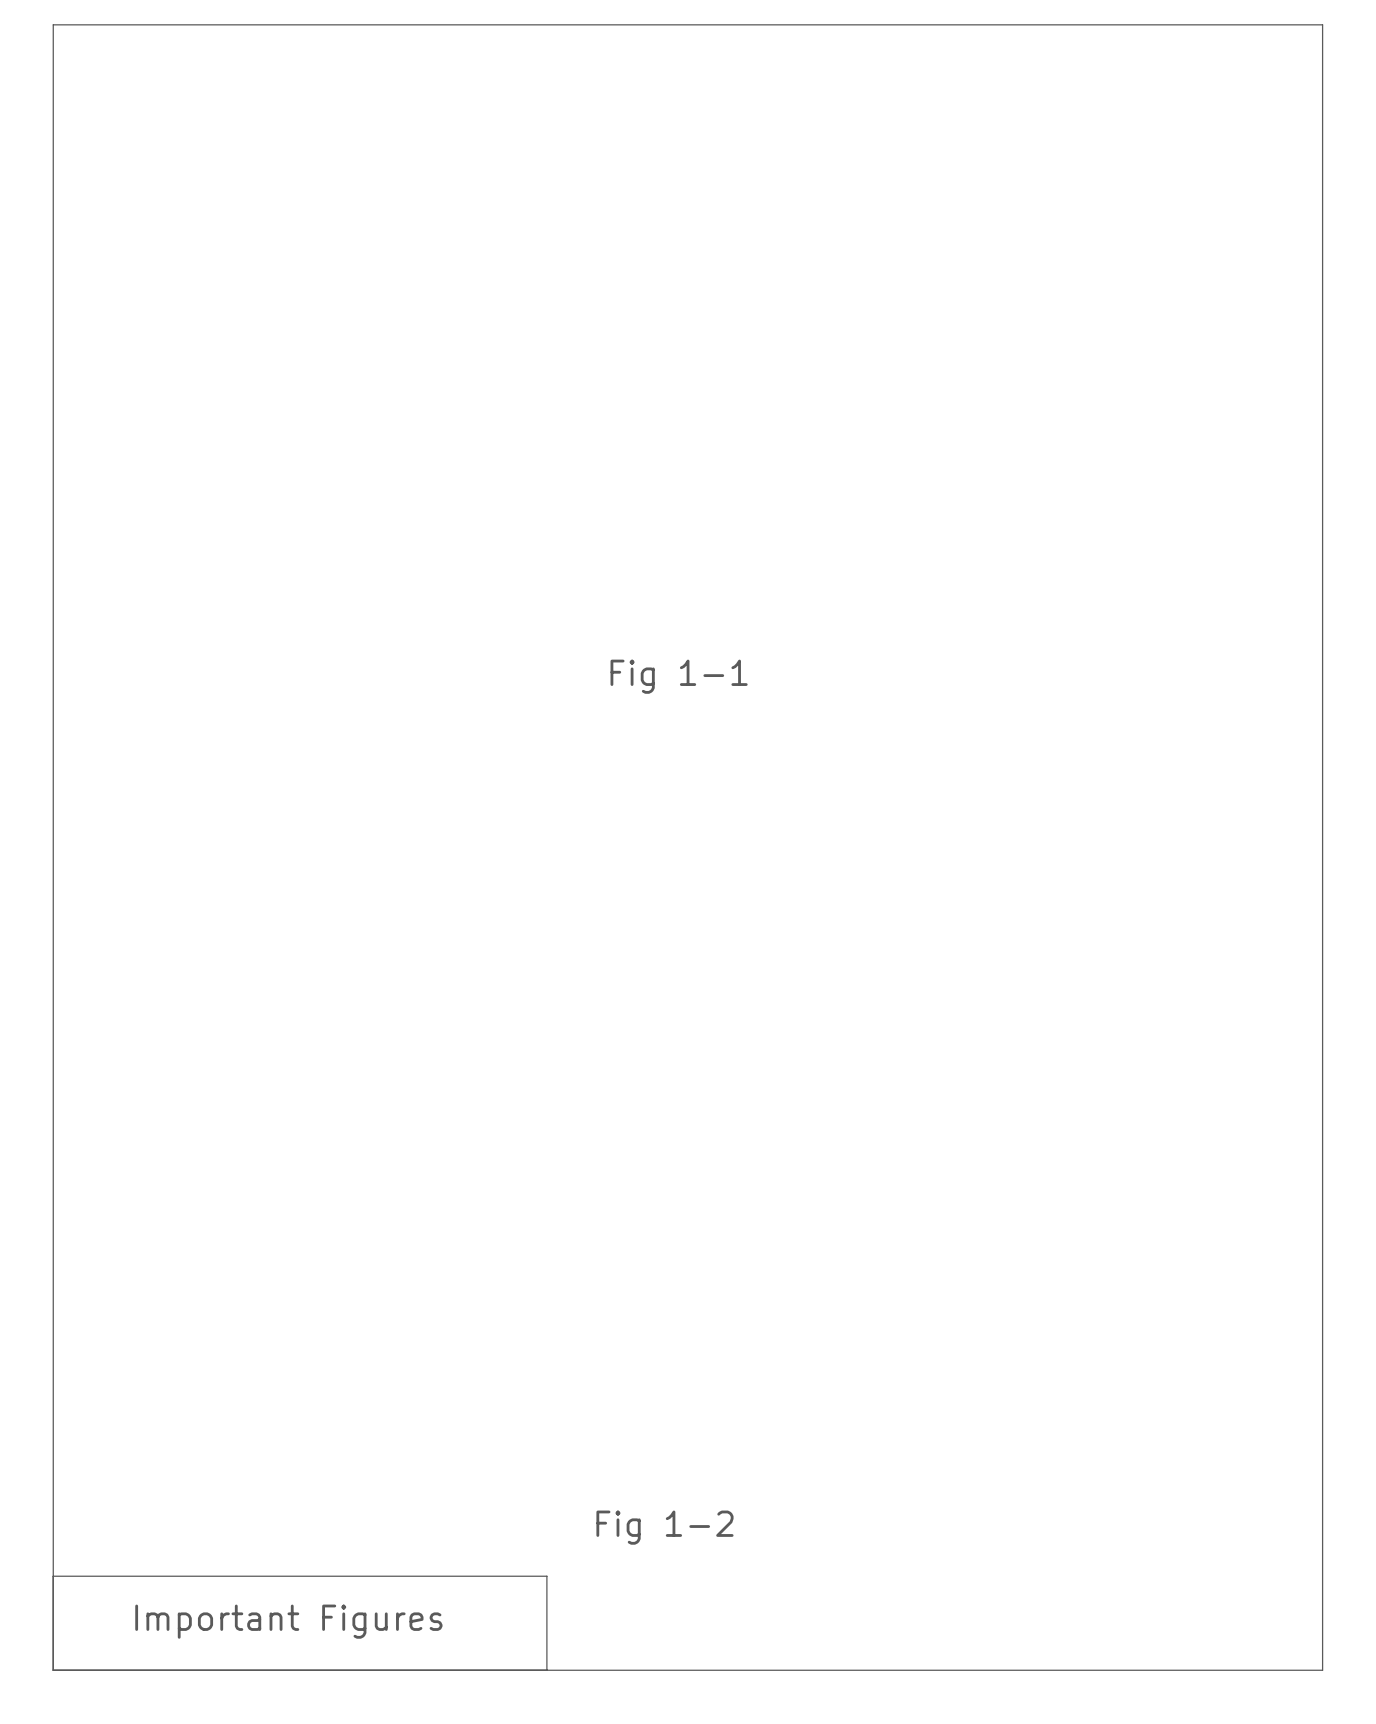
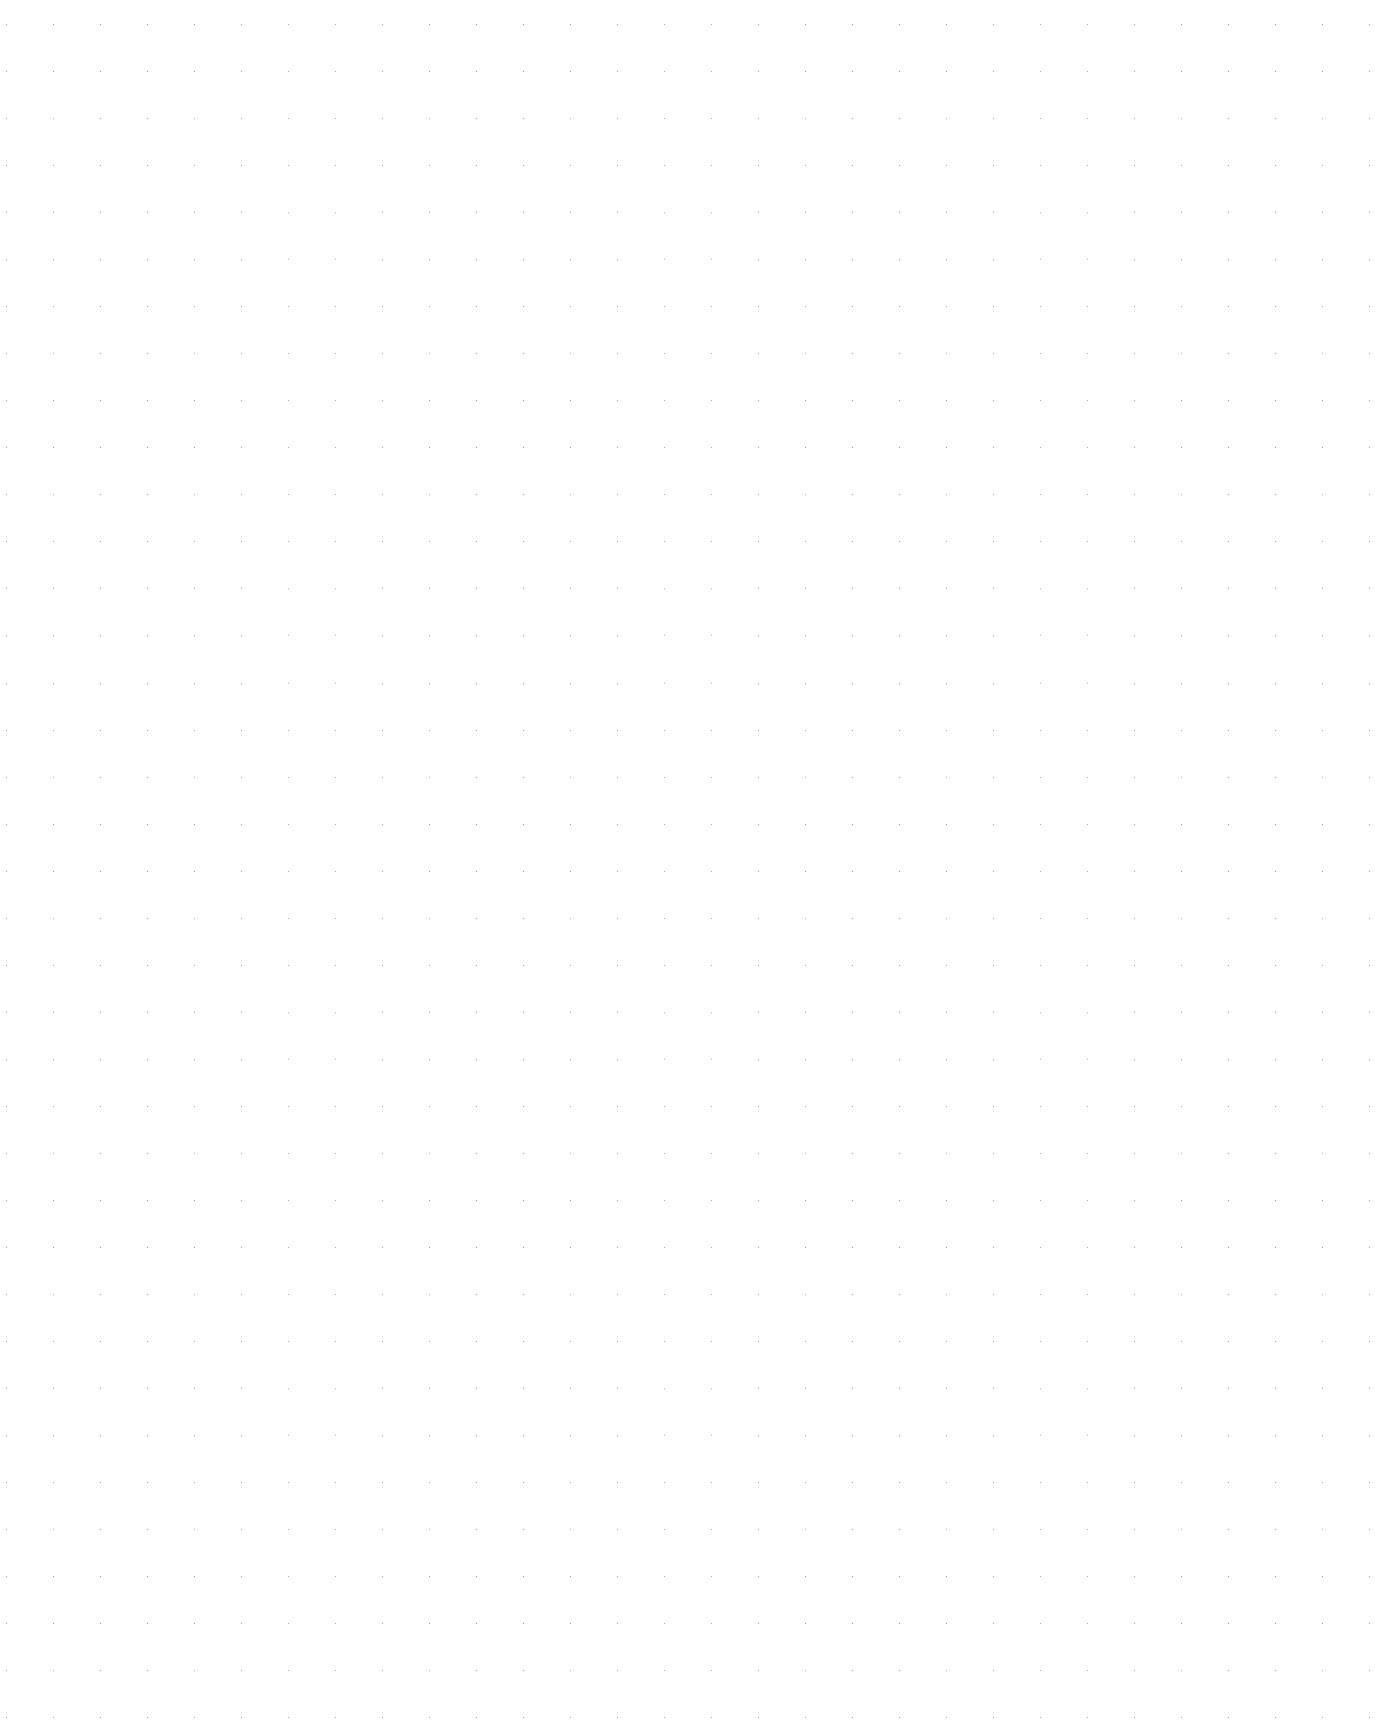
line: (53, 24) (53, 1670) (1322, 1670) (1322, 24) (53, 24) -> none
text: Fig 1-1 (679, 676) -> none
text: Fig 1-2 (664, 1527) -> none
line: (53, 1576) (546, 1576) (546, 1670) -> none
text: Important Figures (288, 1621) -> none

